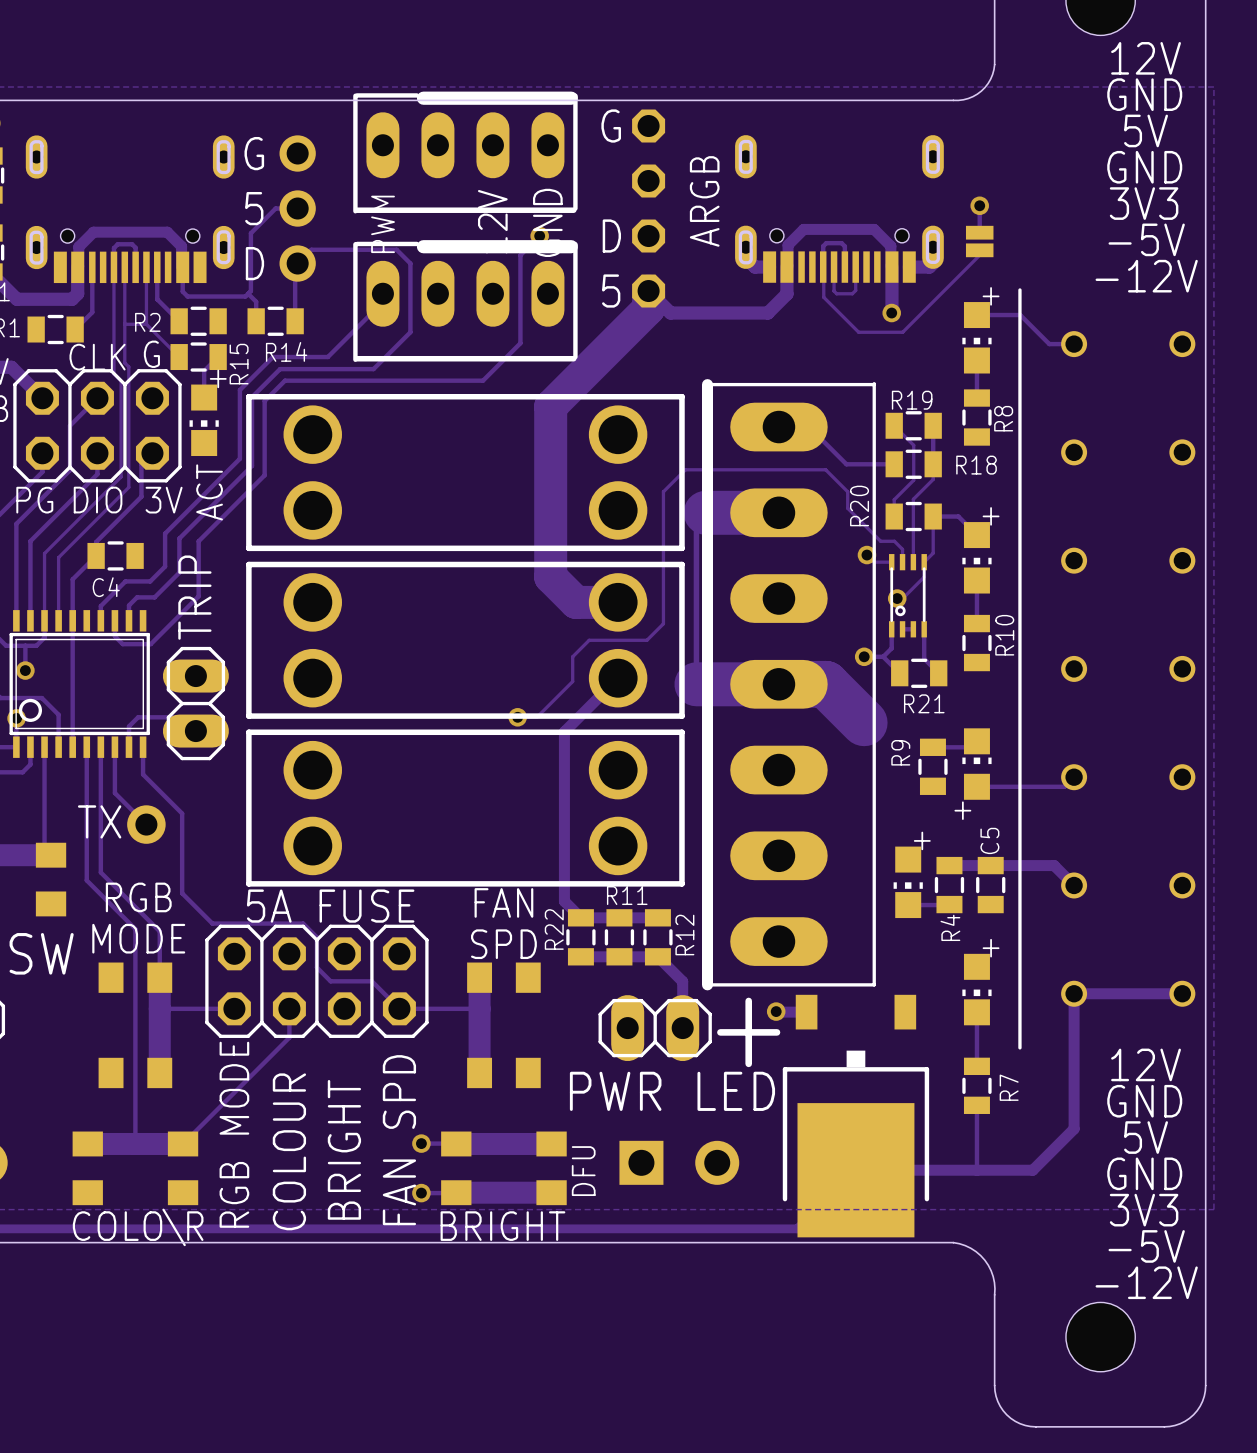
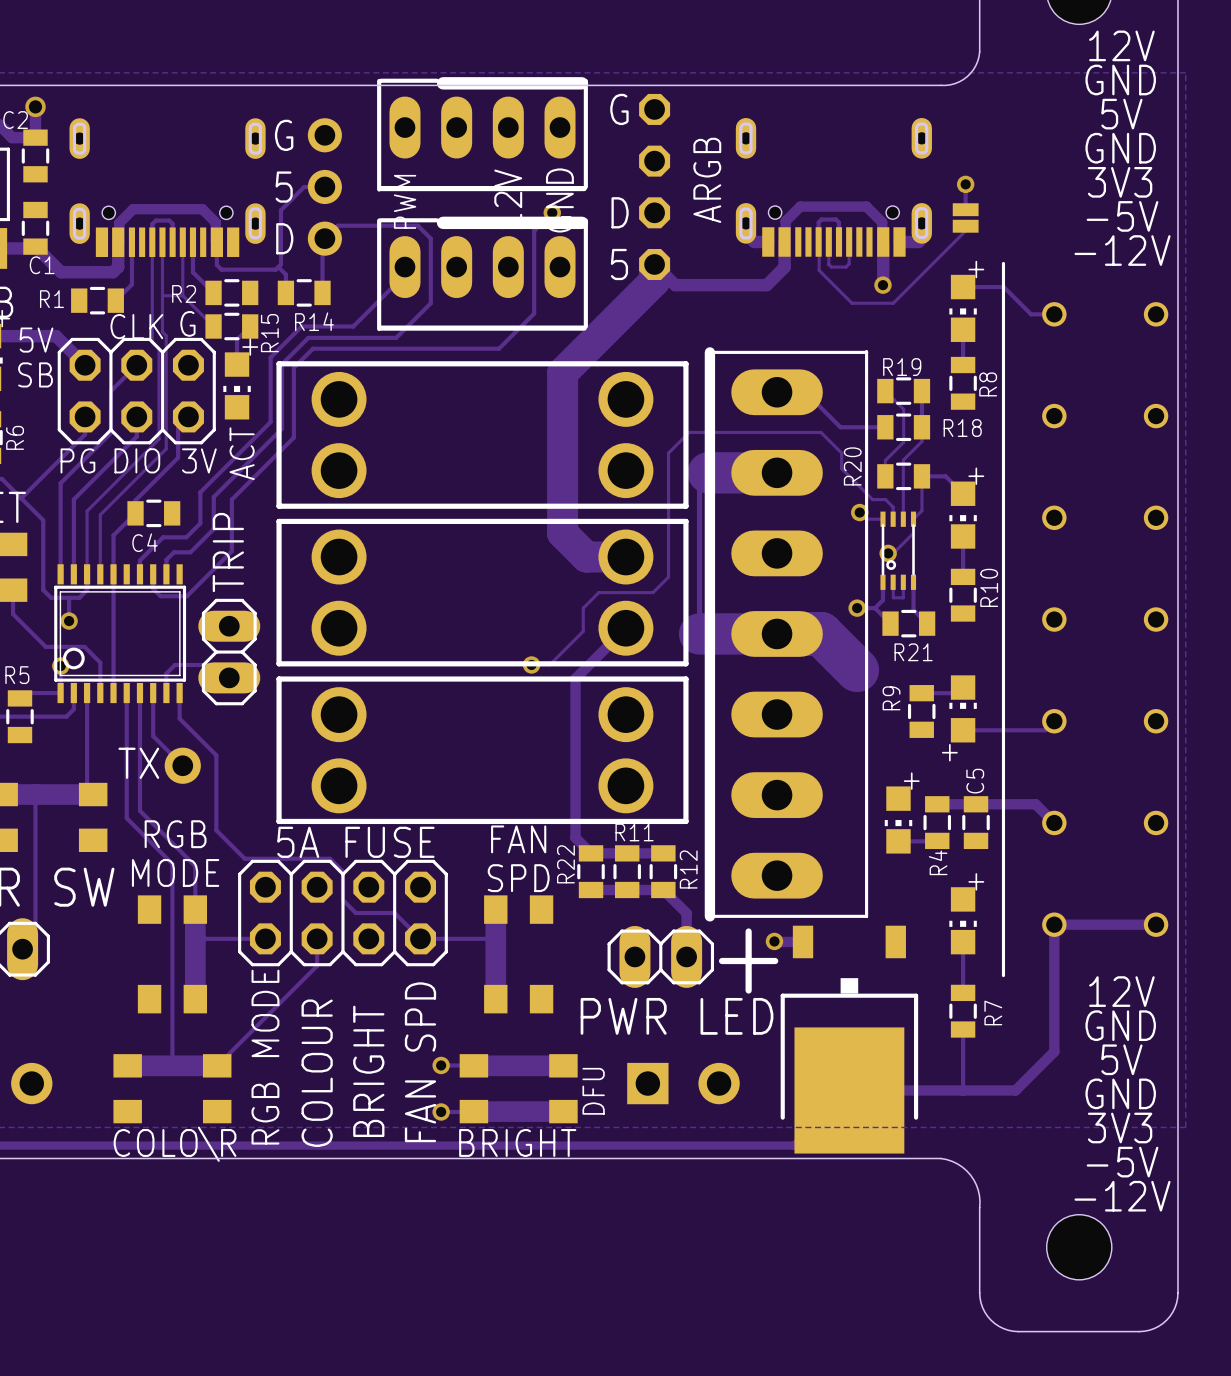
track: (902, 629) (913, 629) -> (893, 582) (893, 597) (903, 597) (903, 582)

